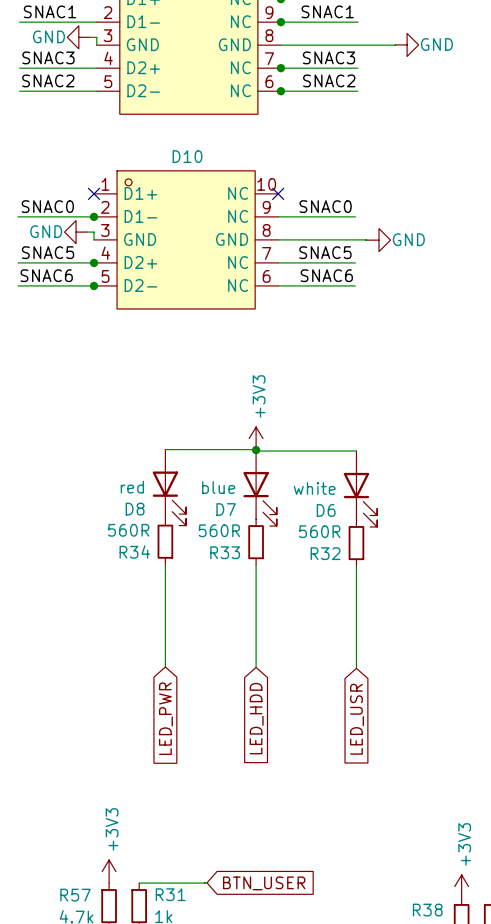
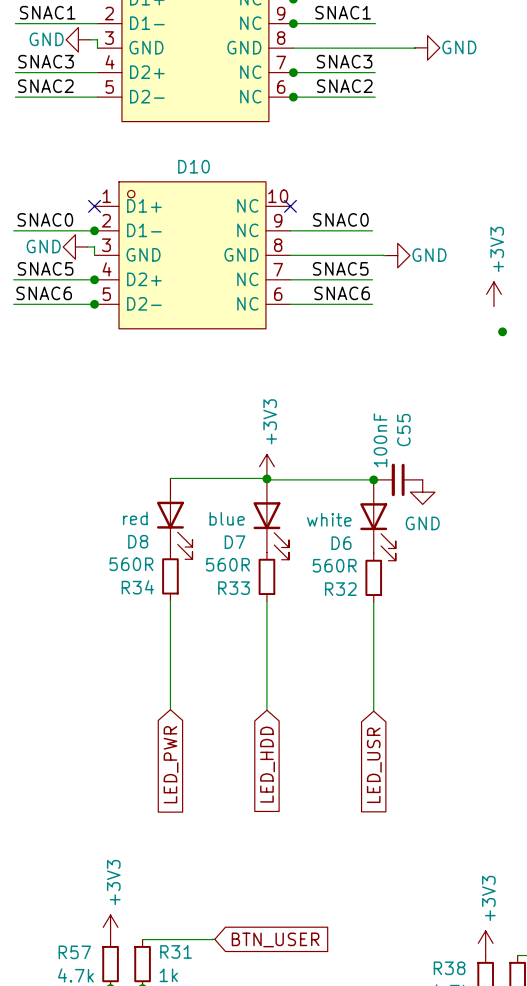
power symbol: none -> +3V3 (493, 294)
junction: none -> (502, 331)
junction: none -> (373, 479)
C55: none -> 100nF (398, 479)
power symbol: none -> GND (422, 492)

